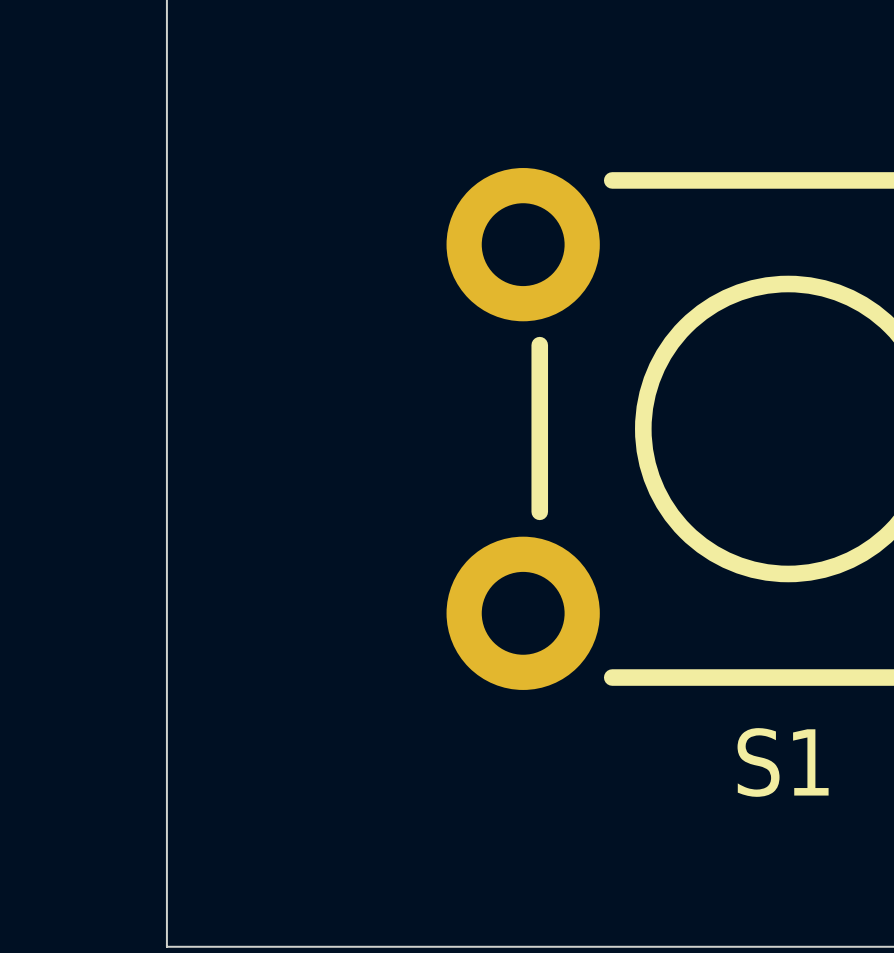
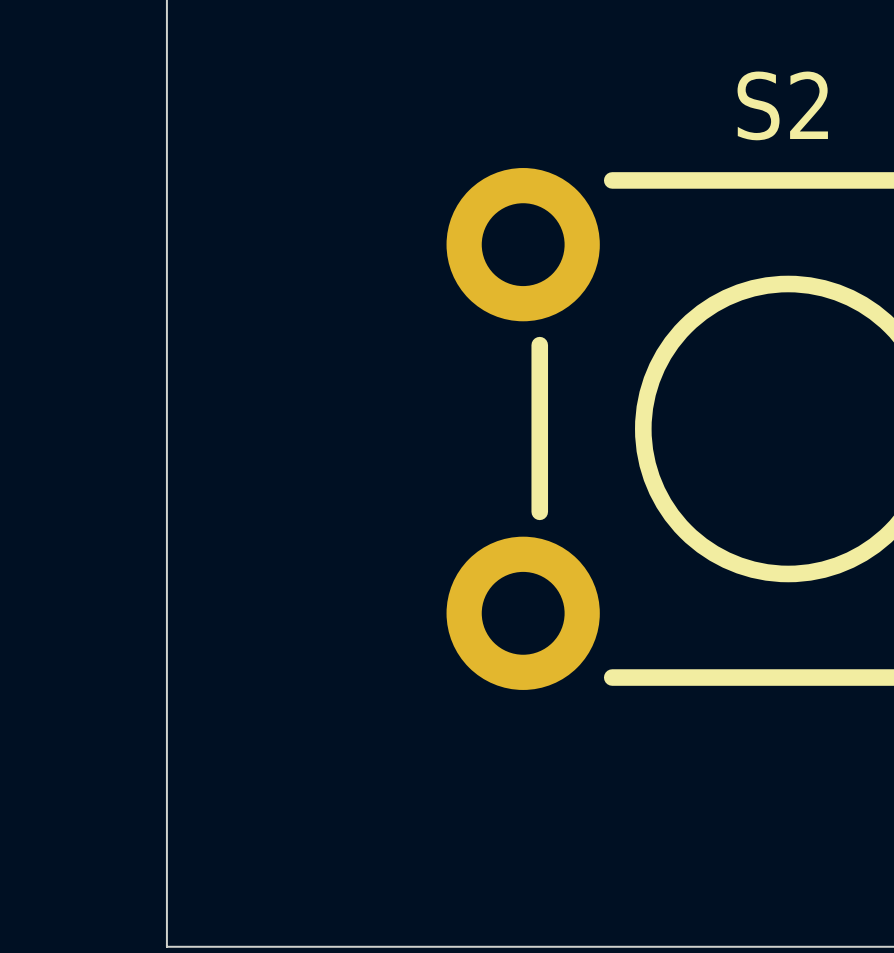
S1 name: S1 (783, 762) -> S2 (782, 105)

